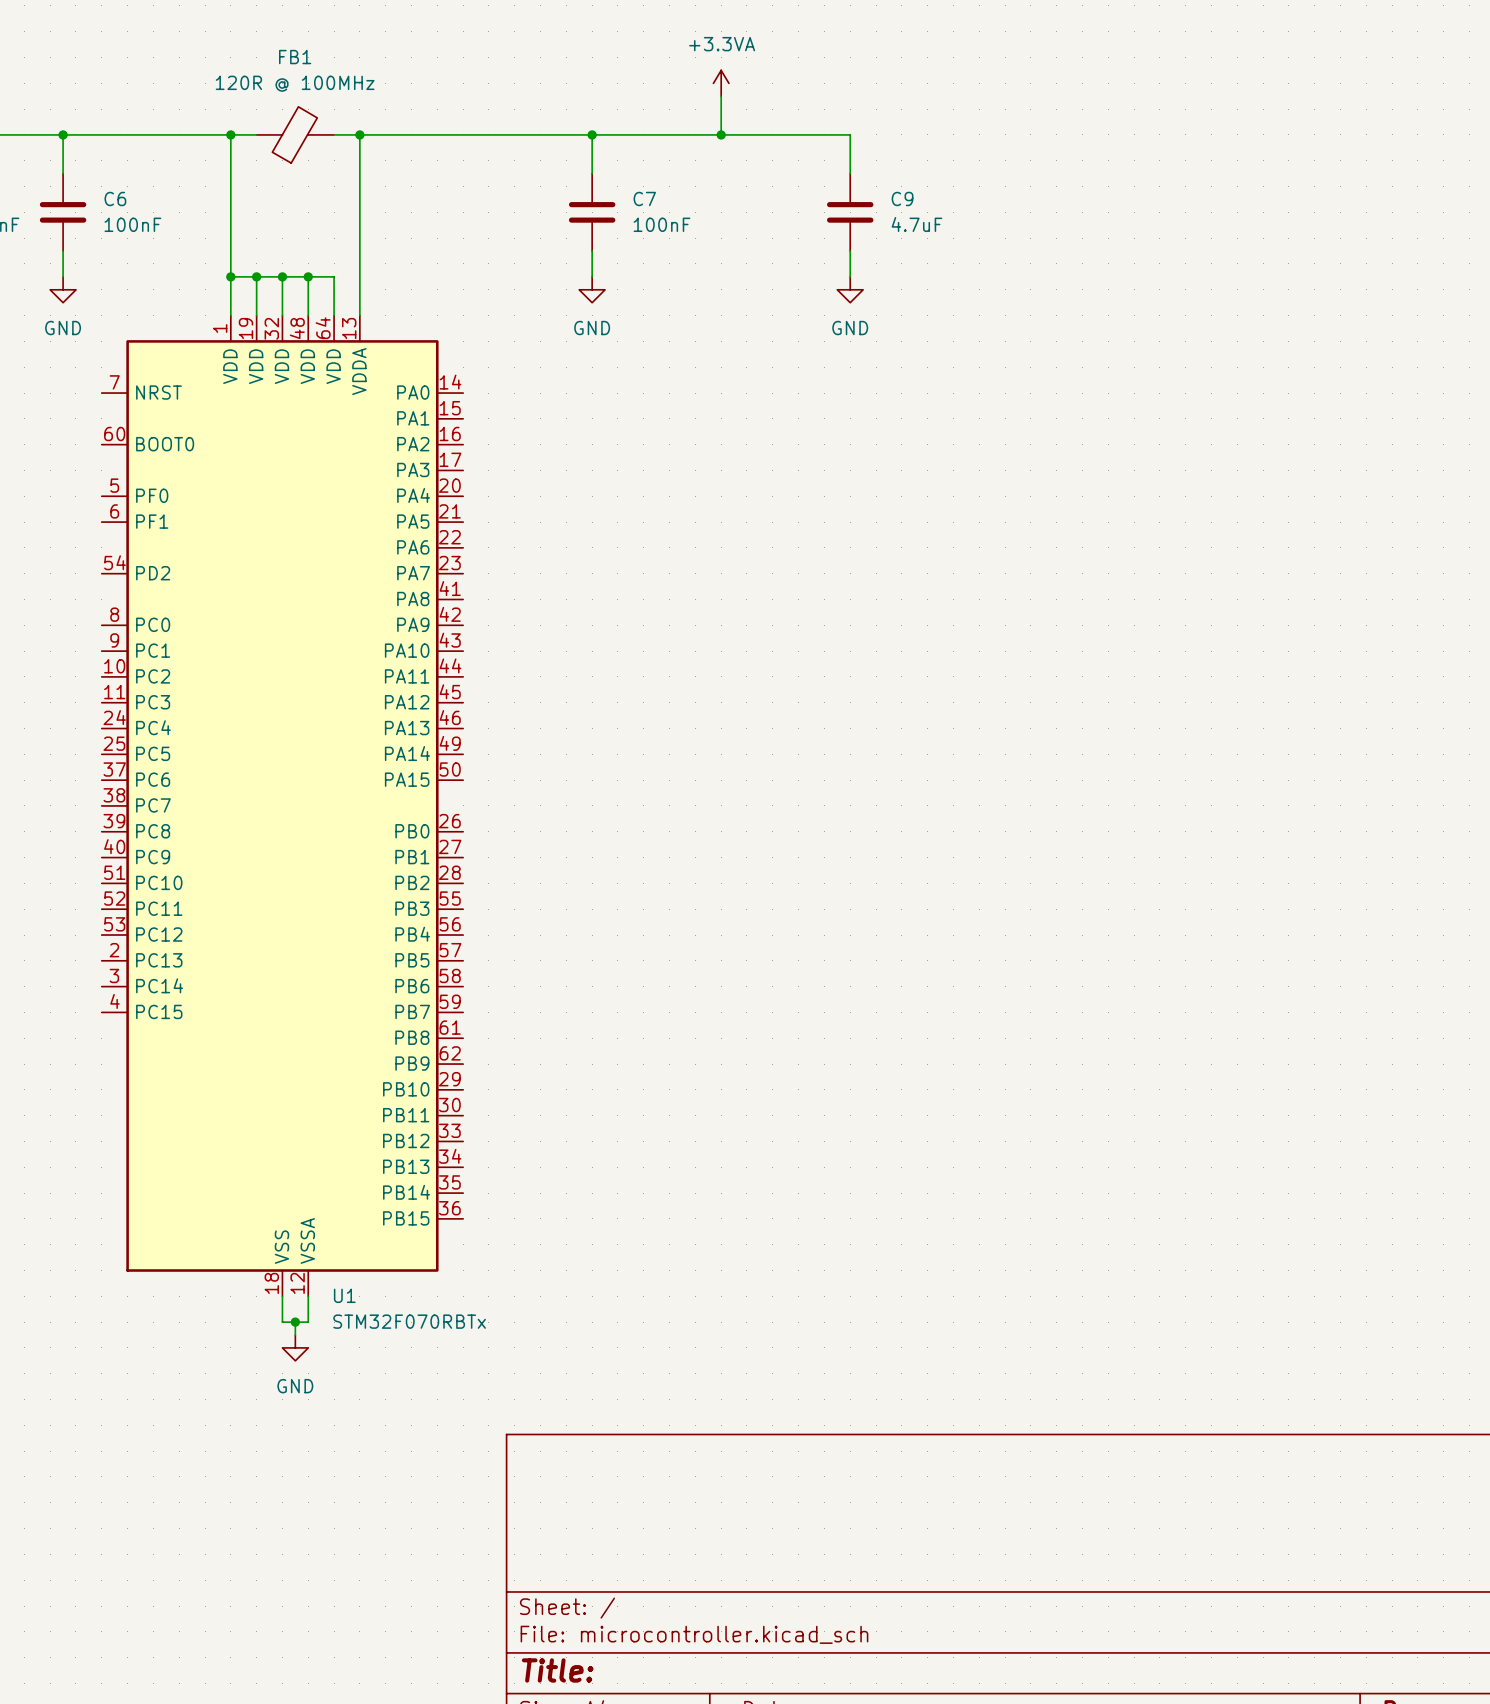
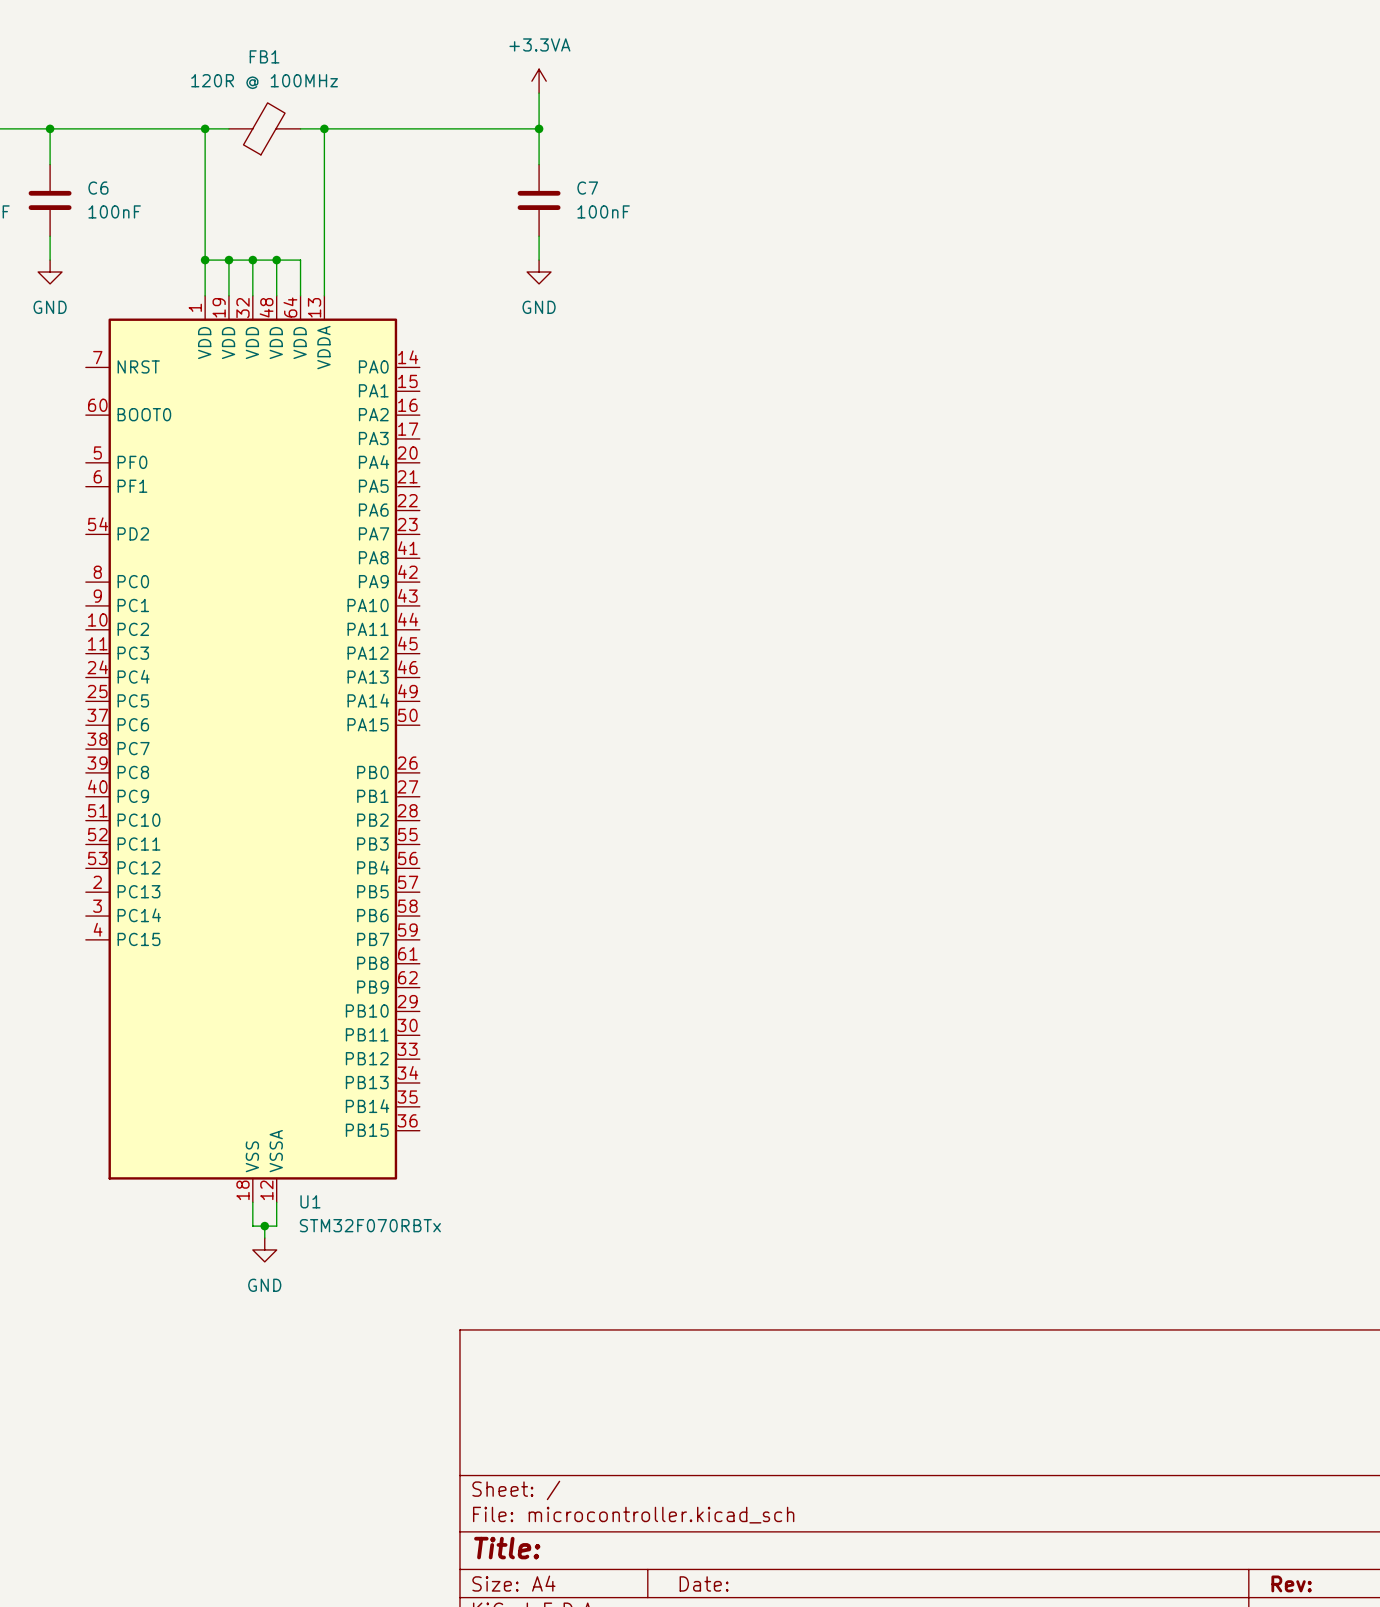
power symbol position: +3.3VA (721, 83) -> +3.3VA (539, 81)
wire: (721, 96) (721, 134) -> none
wire: (592, 134) (850, 134) (850, 173) -> (539, 128) (539, 93)
junction: (721, 134) -> none
C9: 4.7uF (850, 212) -> none
wire: (850, 251) (850, 276) -> none
power symbol: GND (850, 289) -> none

